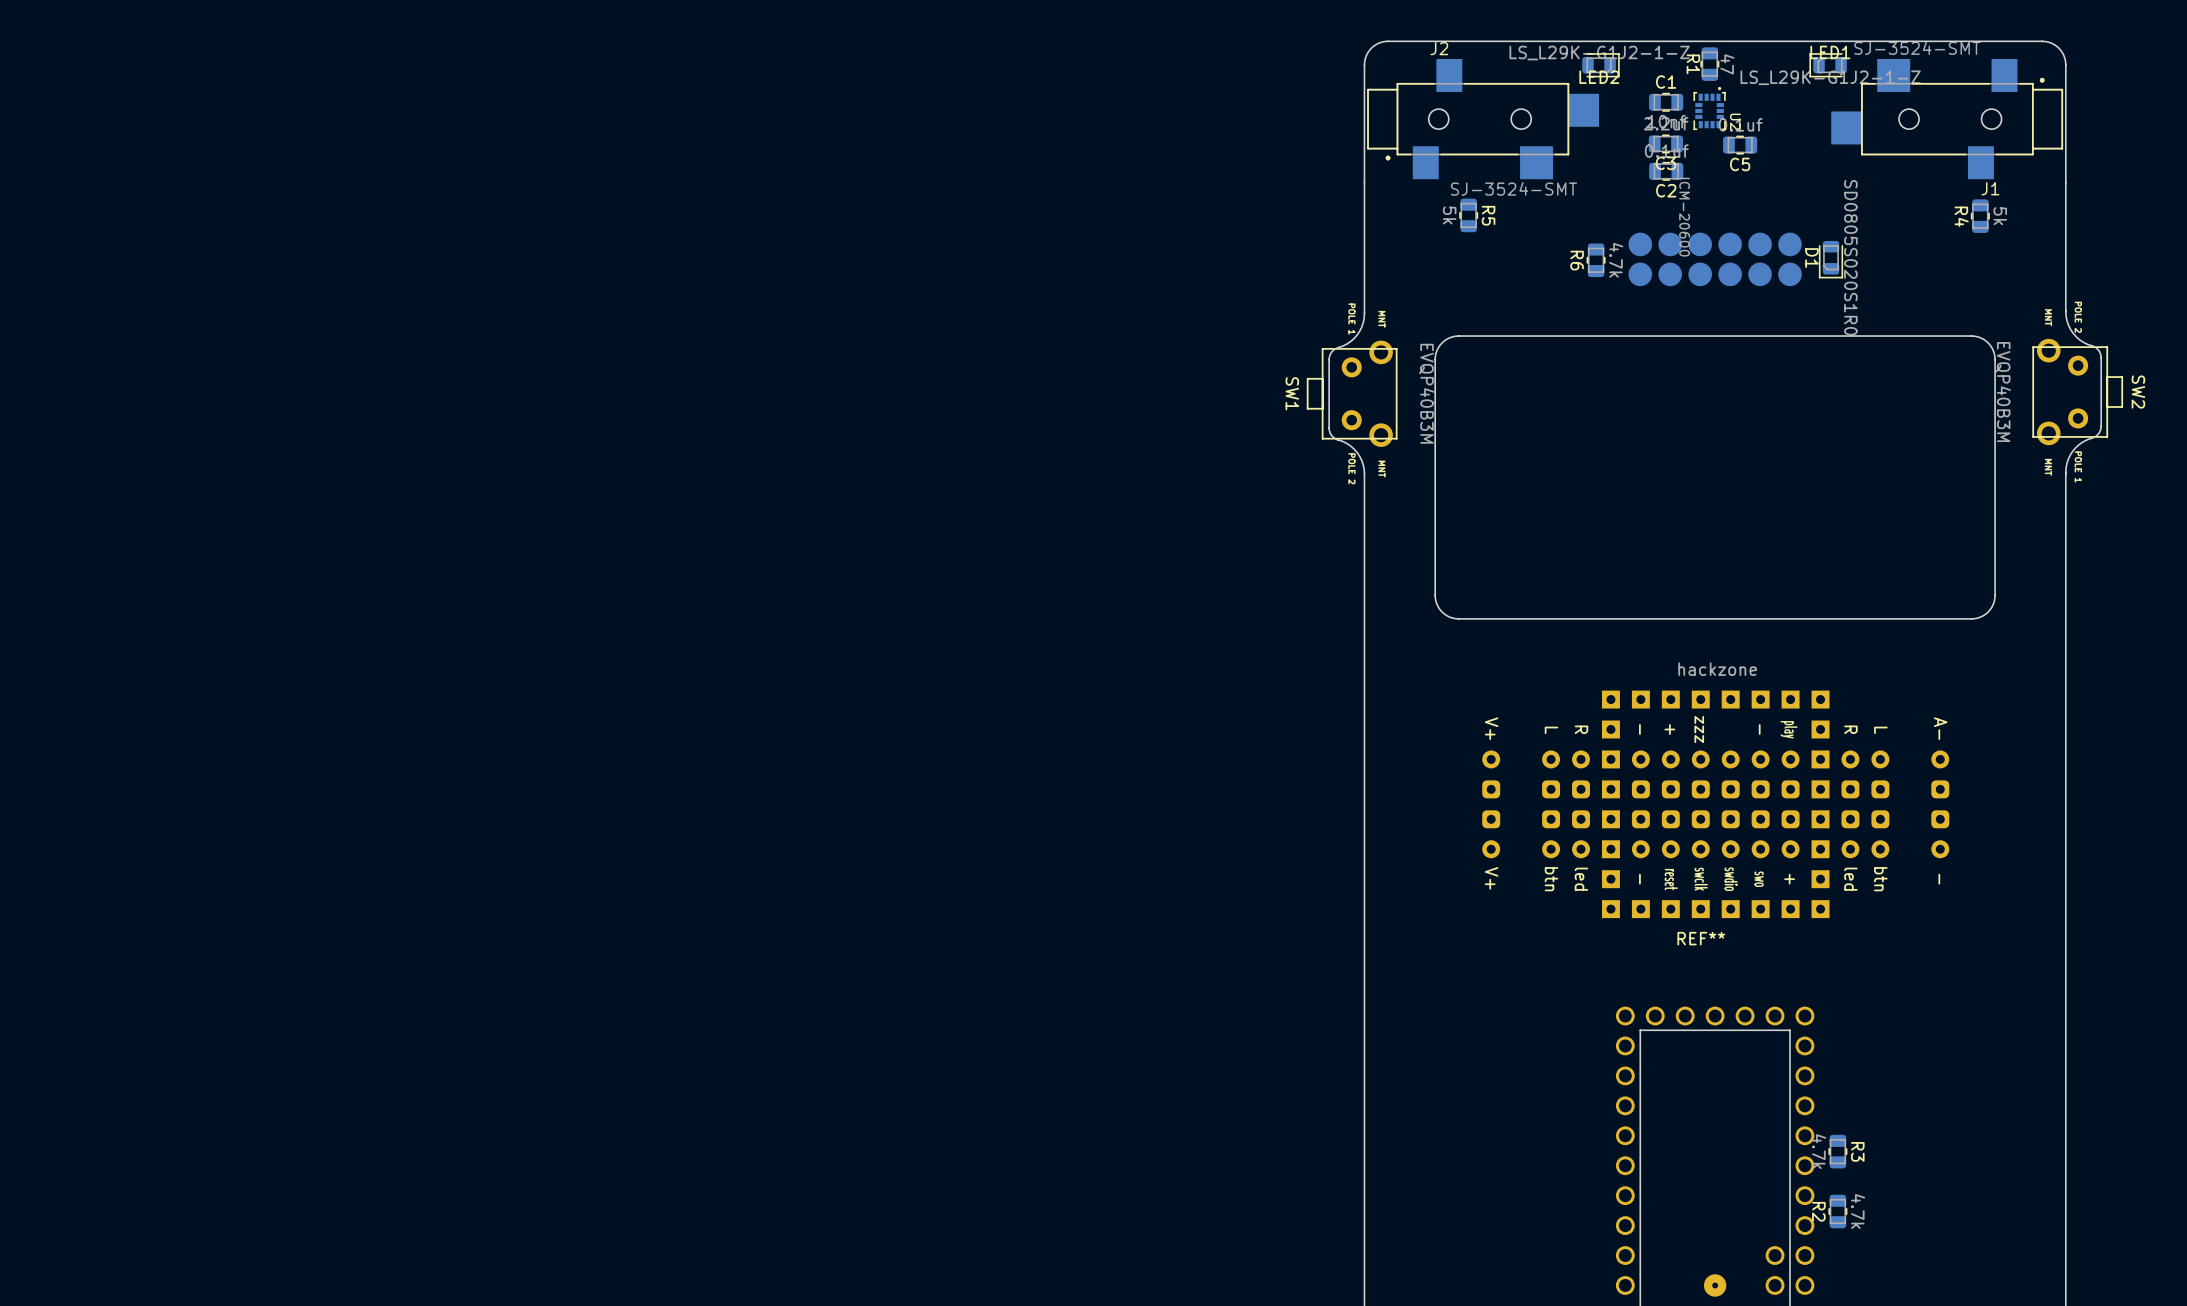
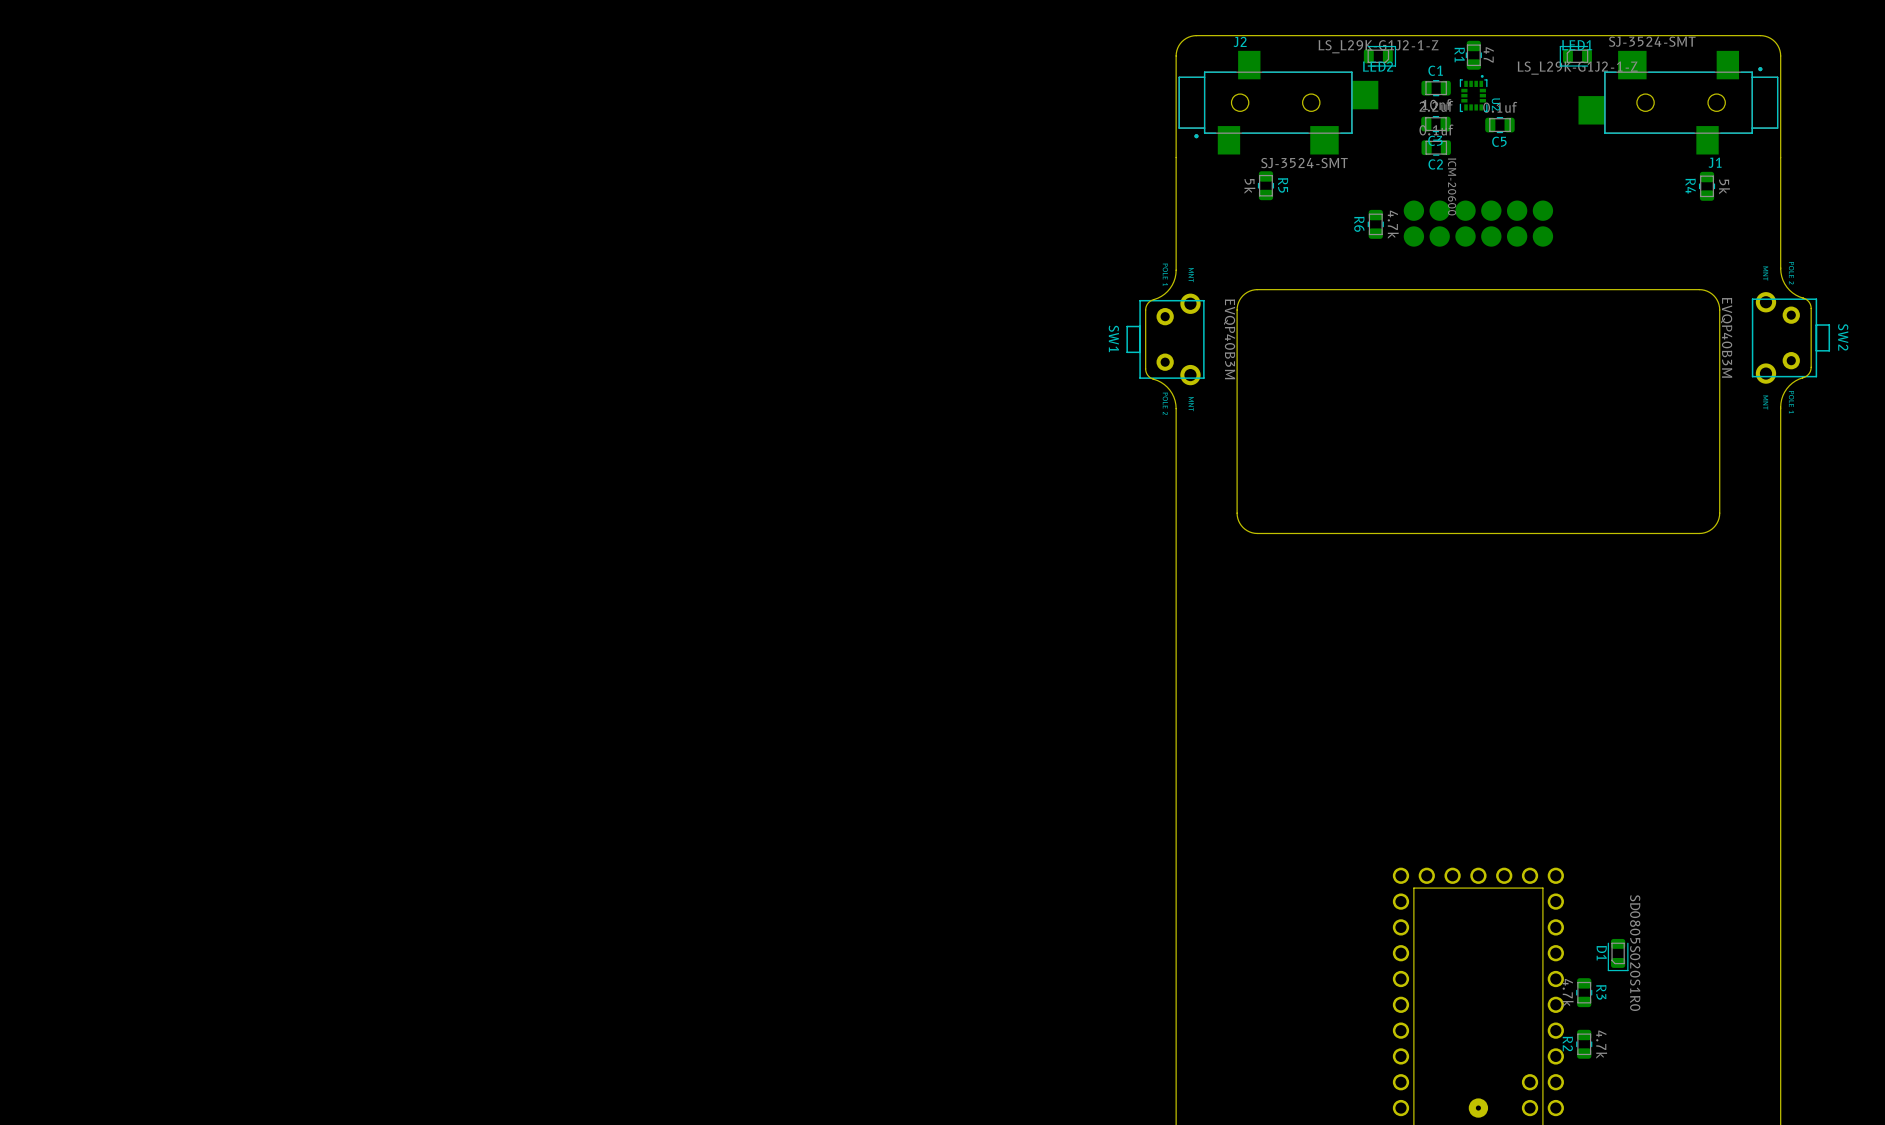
D1 position: (1831, 259) -> (1618, 955)
REF**: hackzone (1715, 804) -> none

